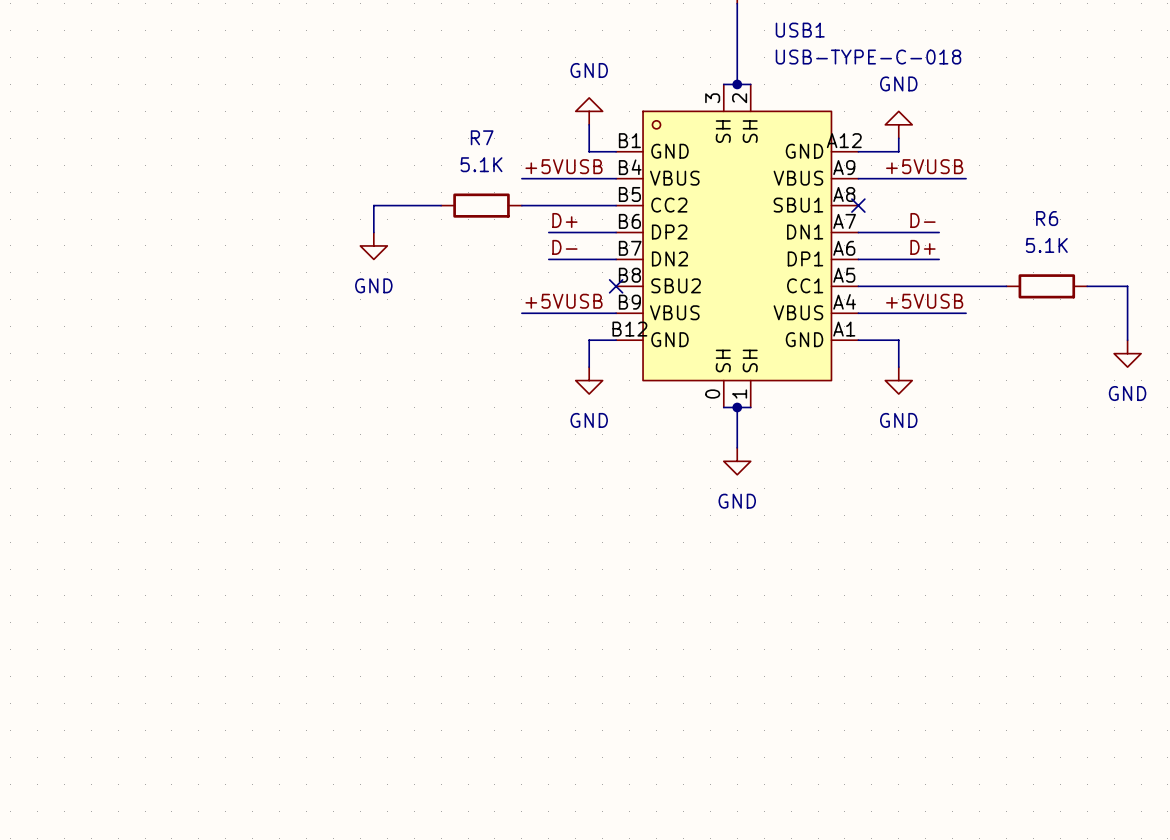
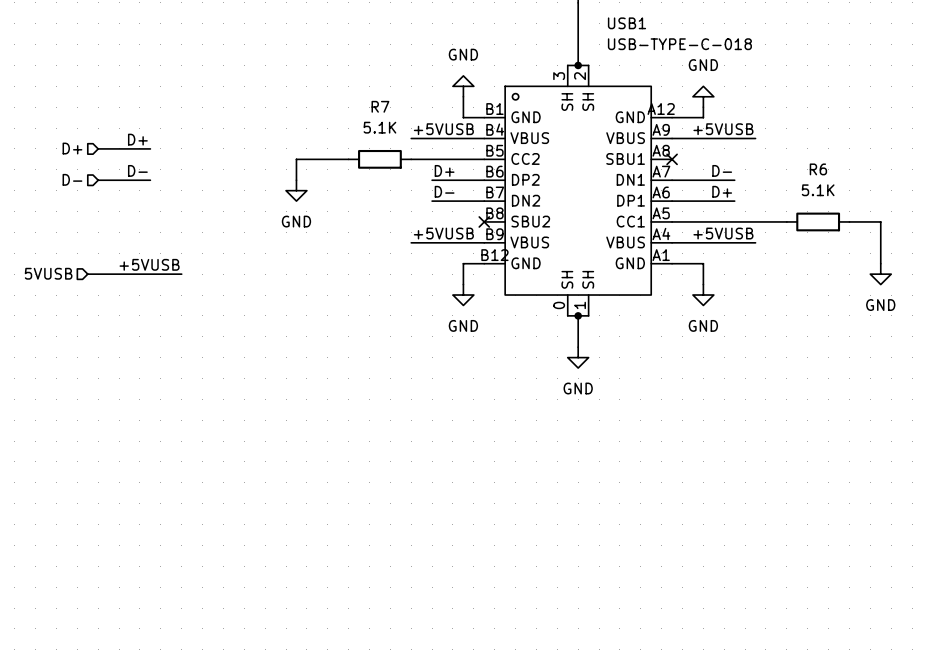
label: none -> D+ (137, 139)
hierarchical label: none -> D+ (72, 148)
wire: none -> (98, 148) (150, 148)
label: none -> D- (137, 170)
hierarchical label: none -> D- (72, 179)
wire: none -> (98, 180) (150, 180)
label: none -> +5VUSB (149, 264)
hierarchical label: none -> 5VUSB (48, 273)
wire: none -> (87, 274) (181, 274)

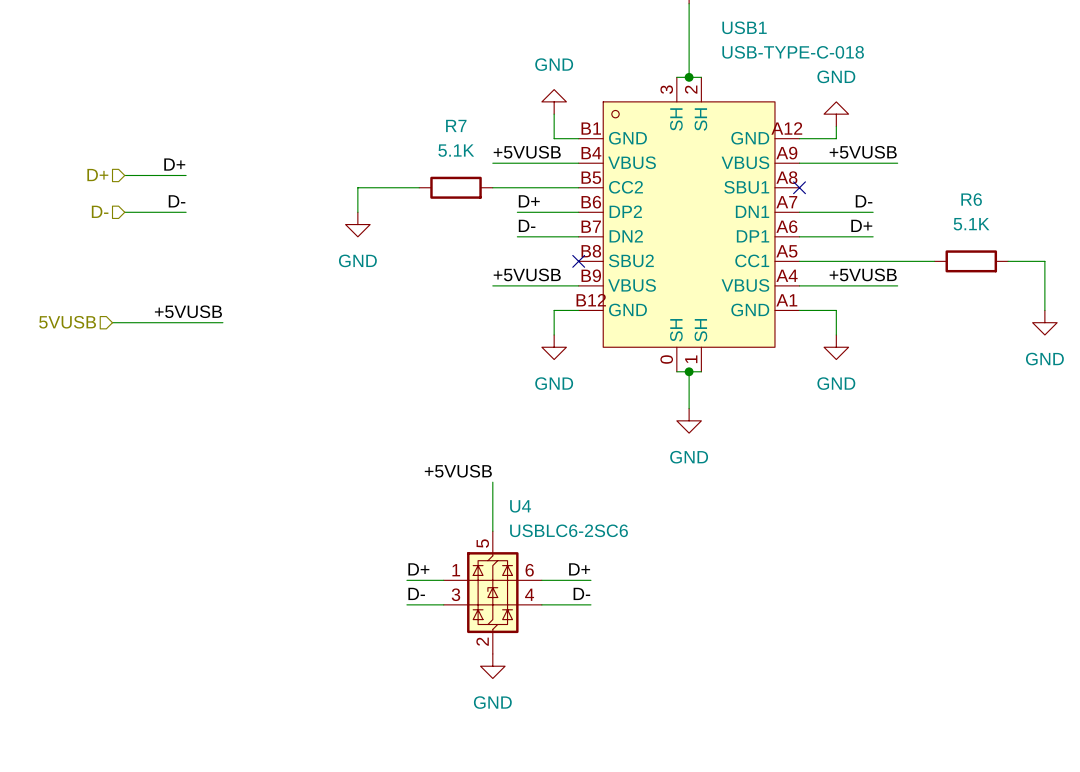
label: none -> +5VUSB (458, 471)
wire: none -> (492, 482) (492, 531)
label: none -> D+ (418, 569)
label: none -> D+ (579, 569)
wire: none -> (406, 580) (443, 580)
wire: none -> (541, 580) (590, 580)
U4: none -> USBLC6-2SC6 (492, 592)
label: none -> D- (416, 593)
label: none -> D- (581, 593)
wire: none -> (406, 604) (443, 604)
wire: none -> (541, 604) (590, 604)
power symbol: none -> GND (492, 666)

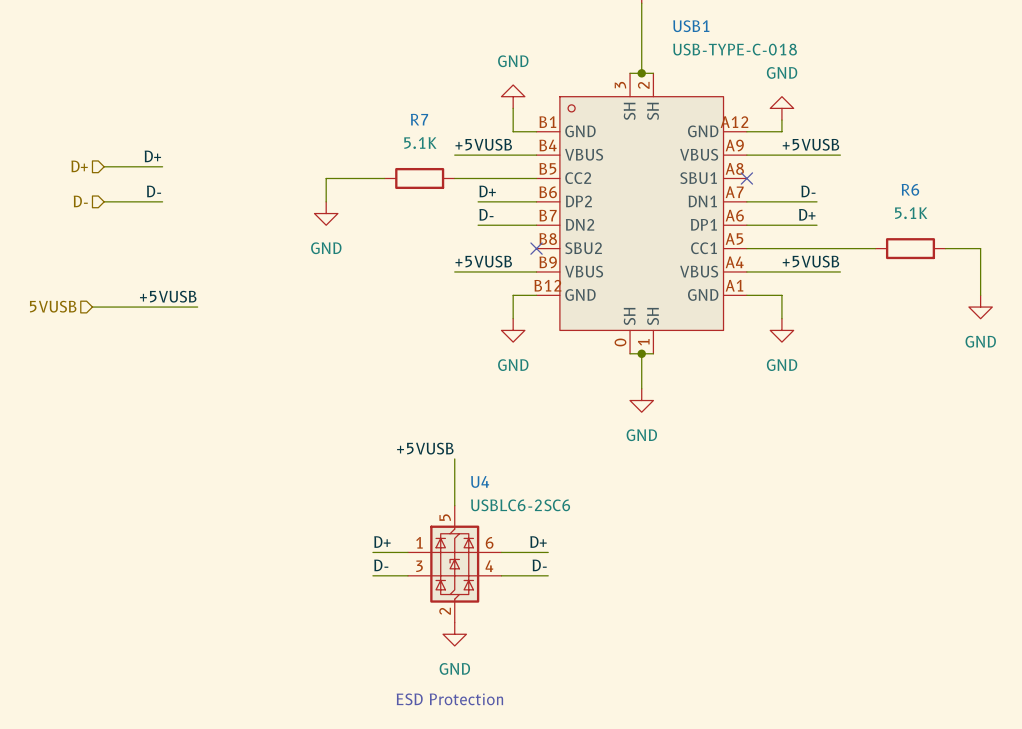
text: none -> ESD Protection (449, 699)

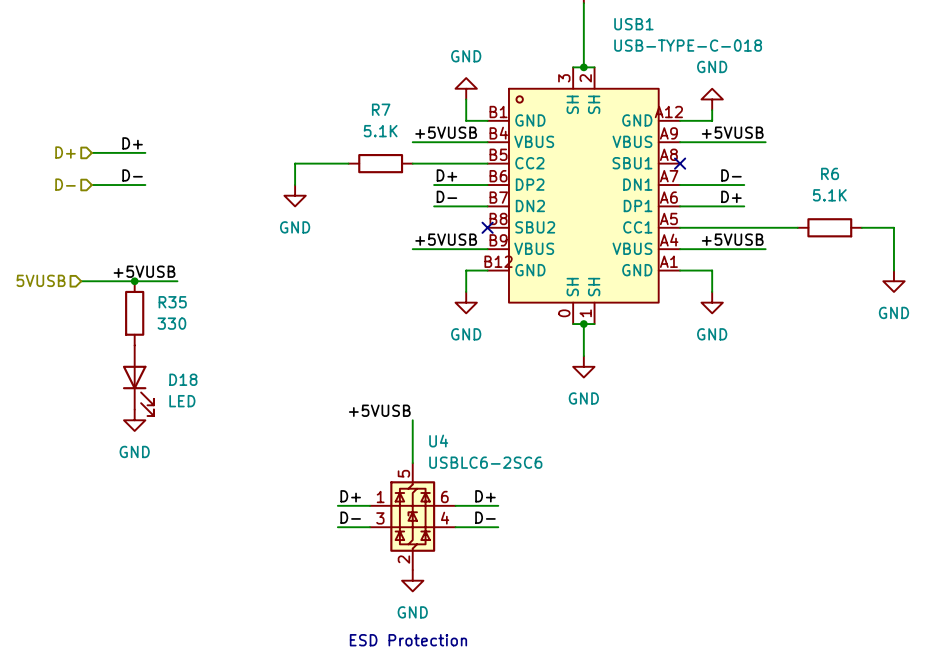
junction: none -> (134, 281)
R35: none -> 330 (134, 313)
D18: none -> LED (138, 380)
power symbol: none -> GND (134, 420)

